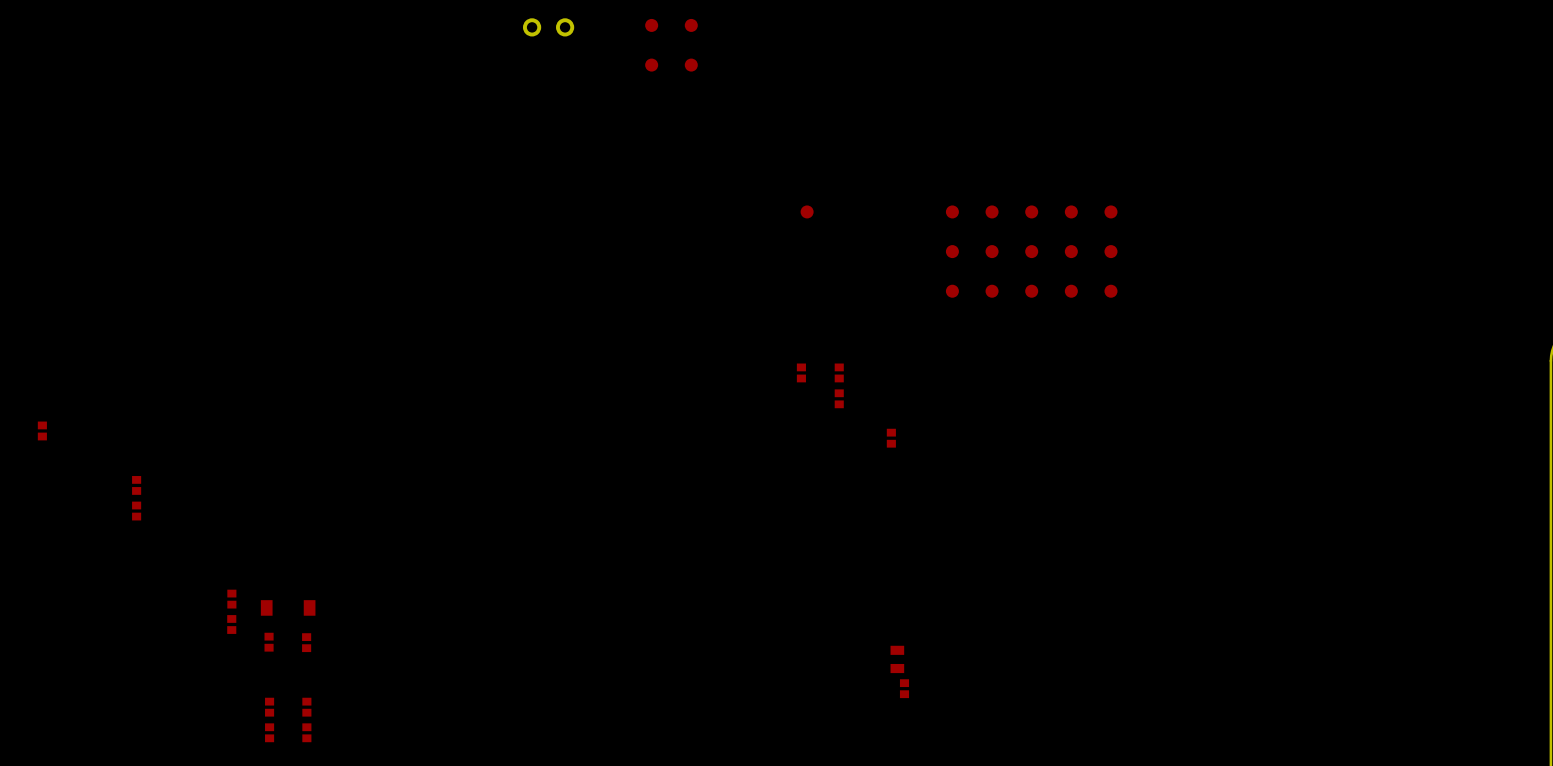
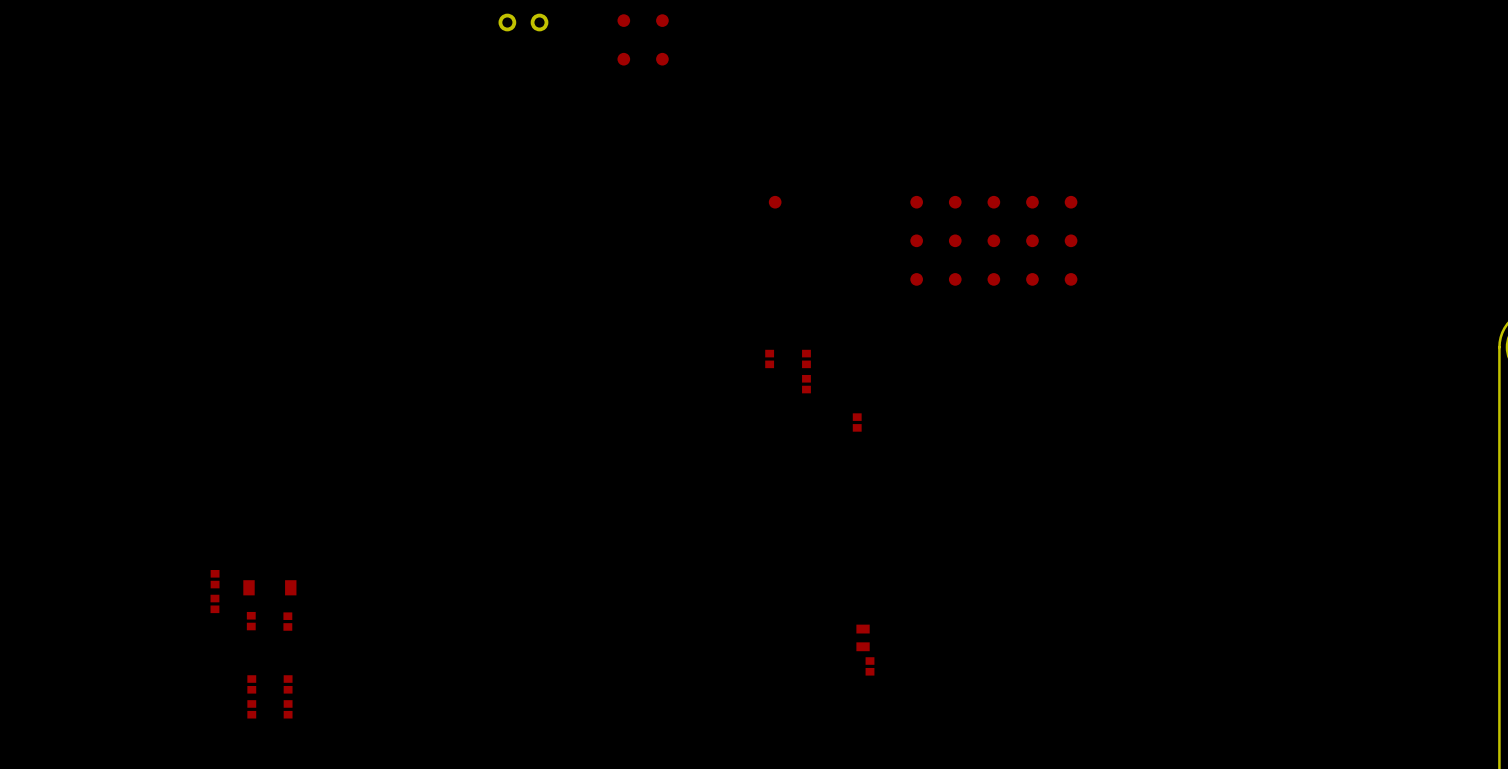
part: (42, 430) -> none
part: (136, 485) -> none
part: (136, 511) -> none

